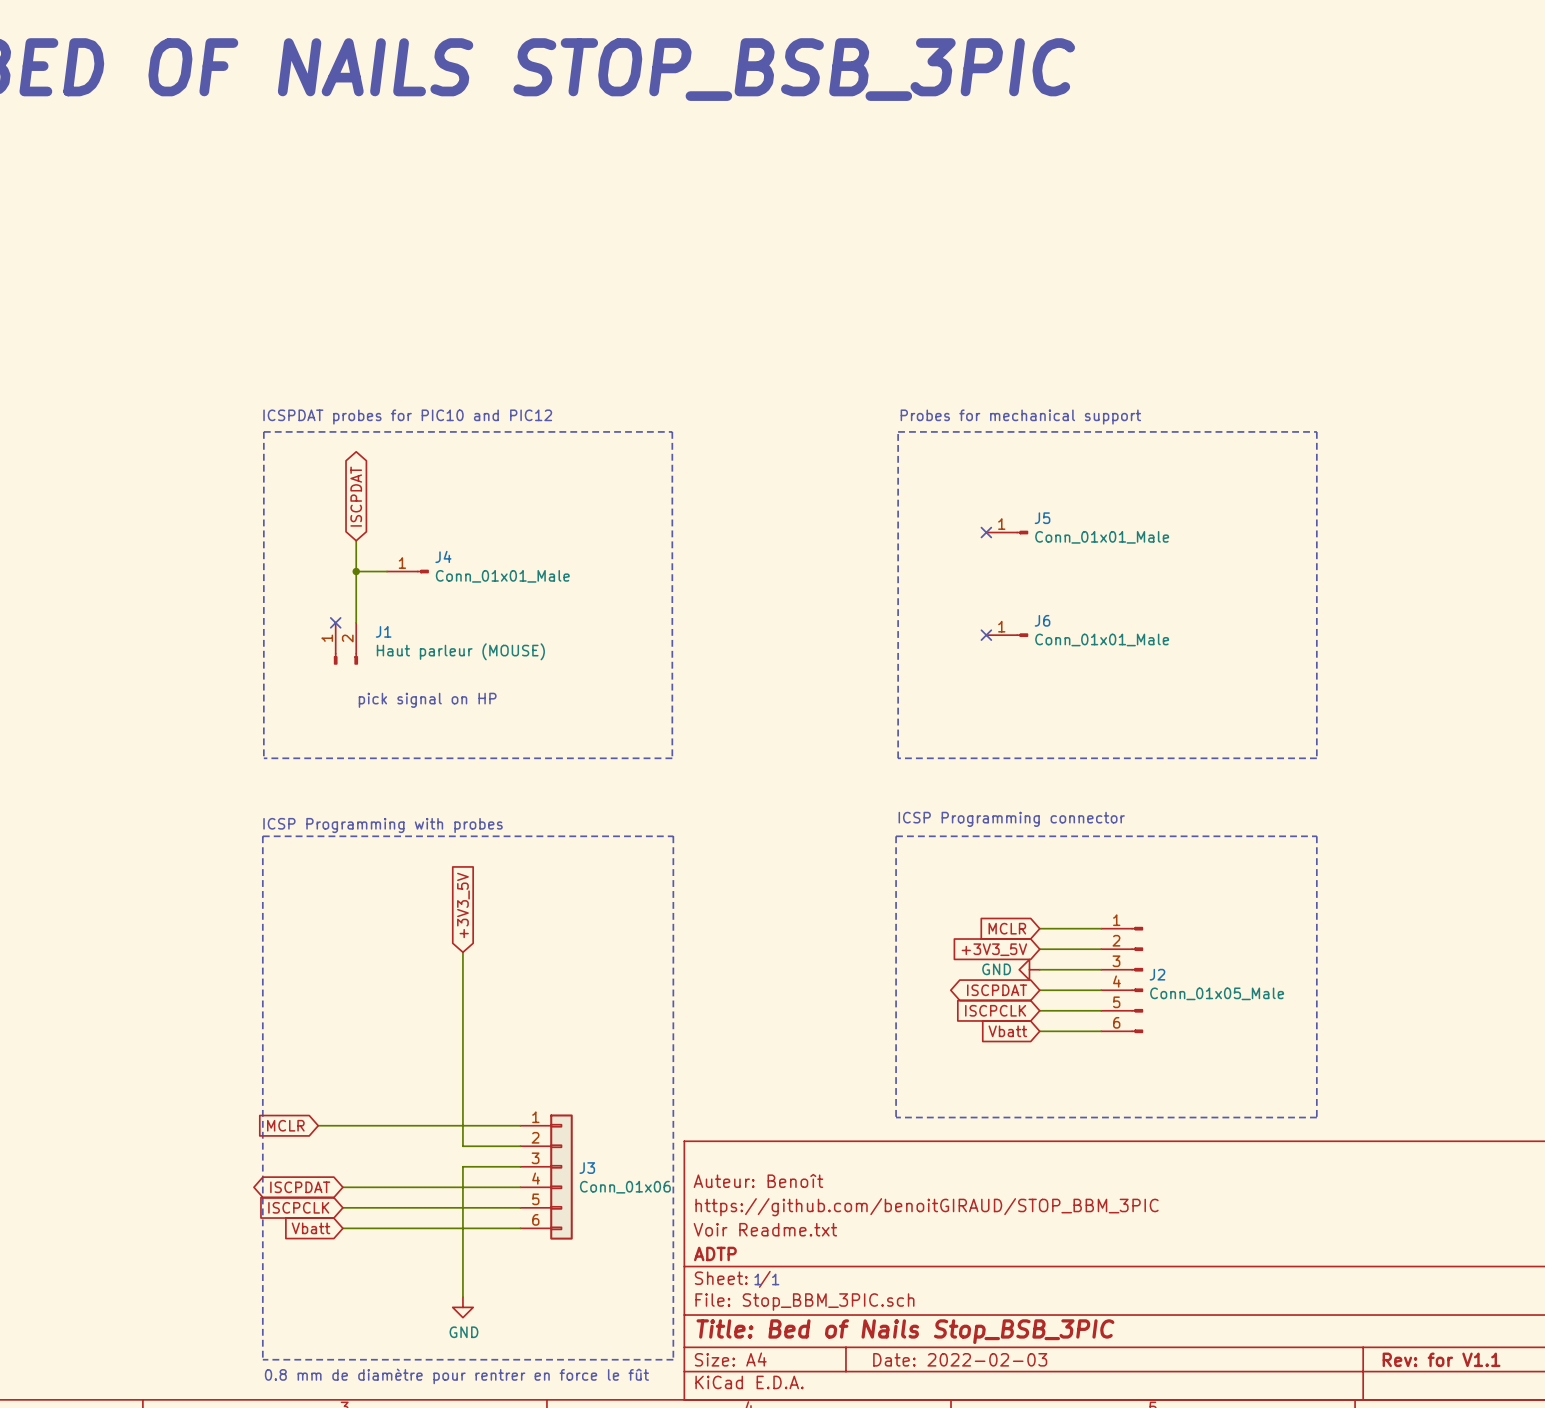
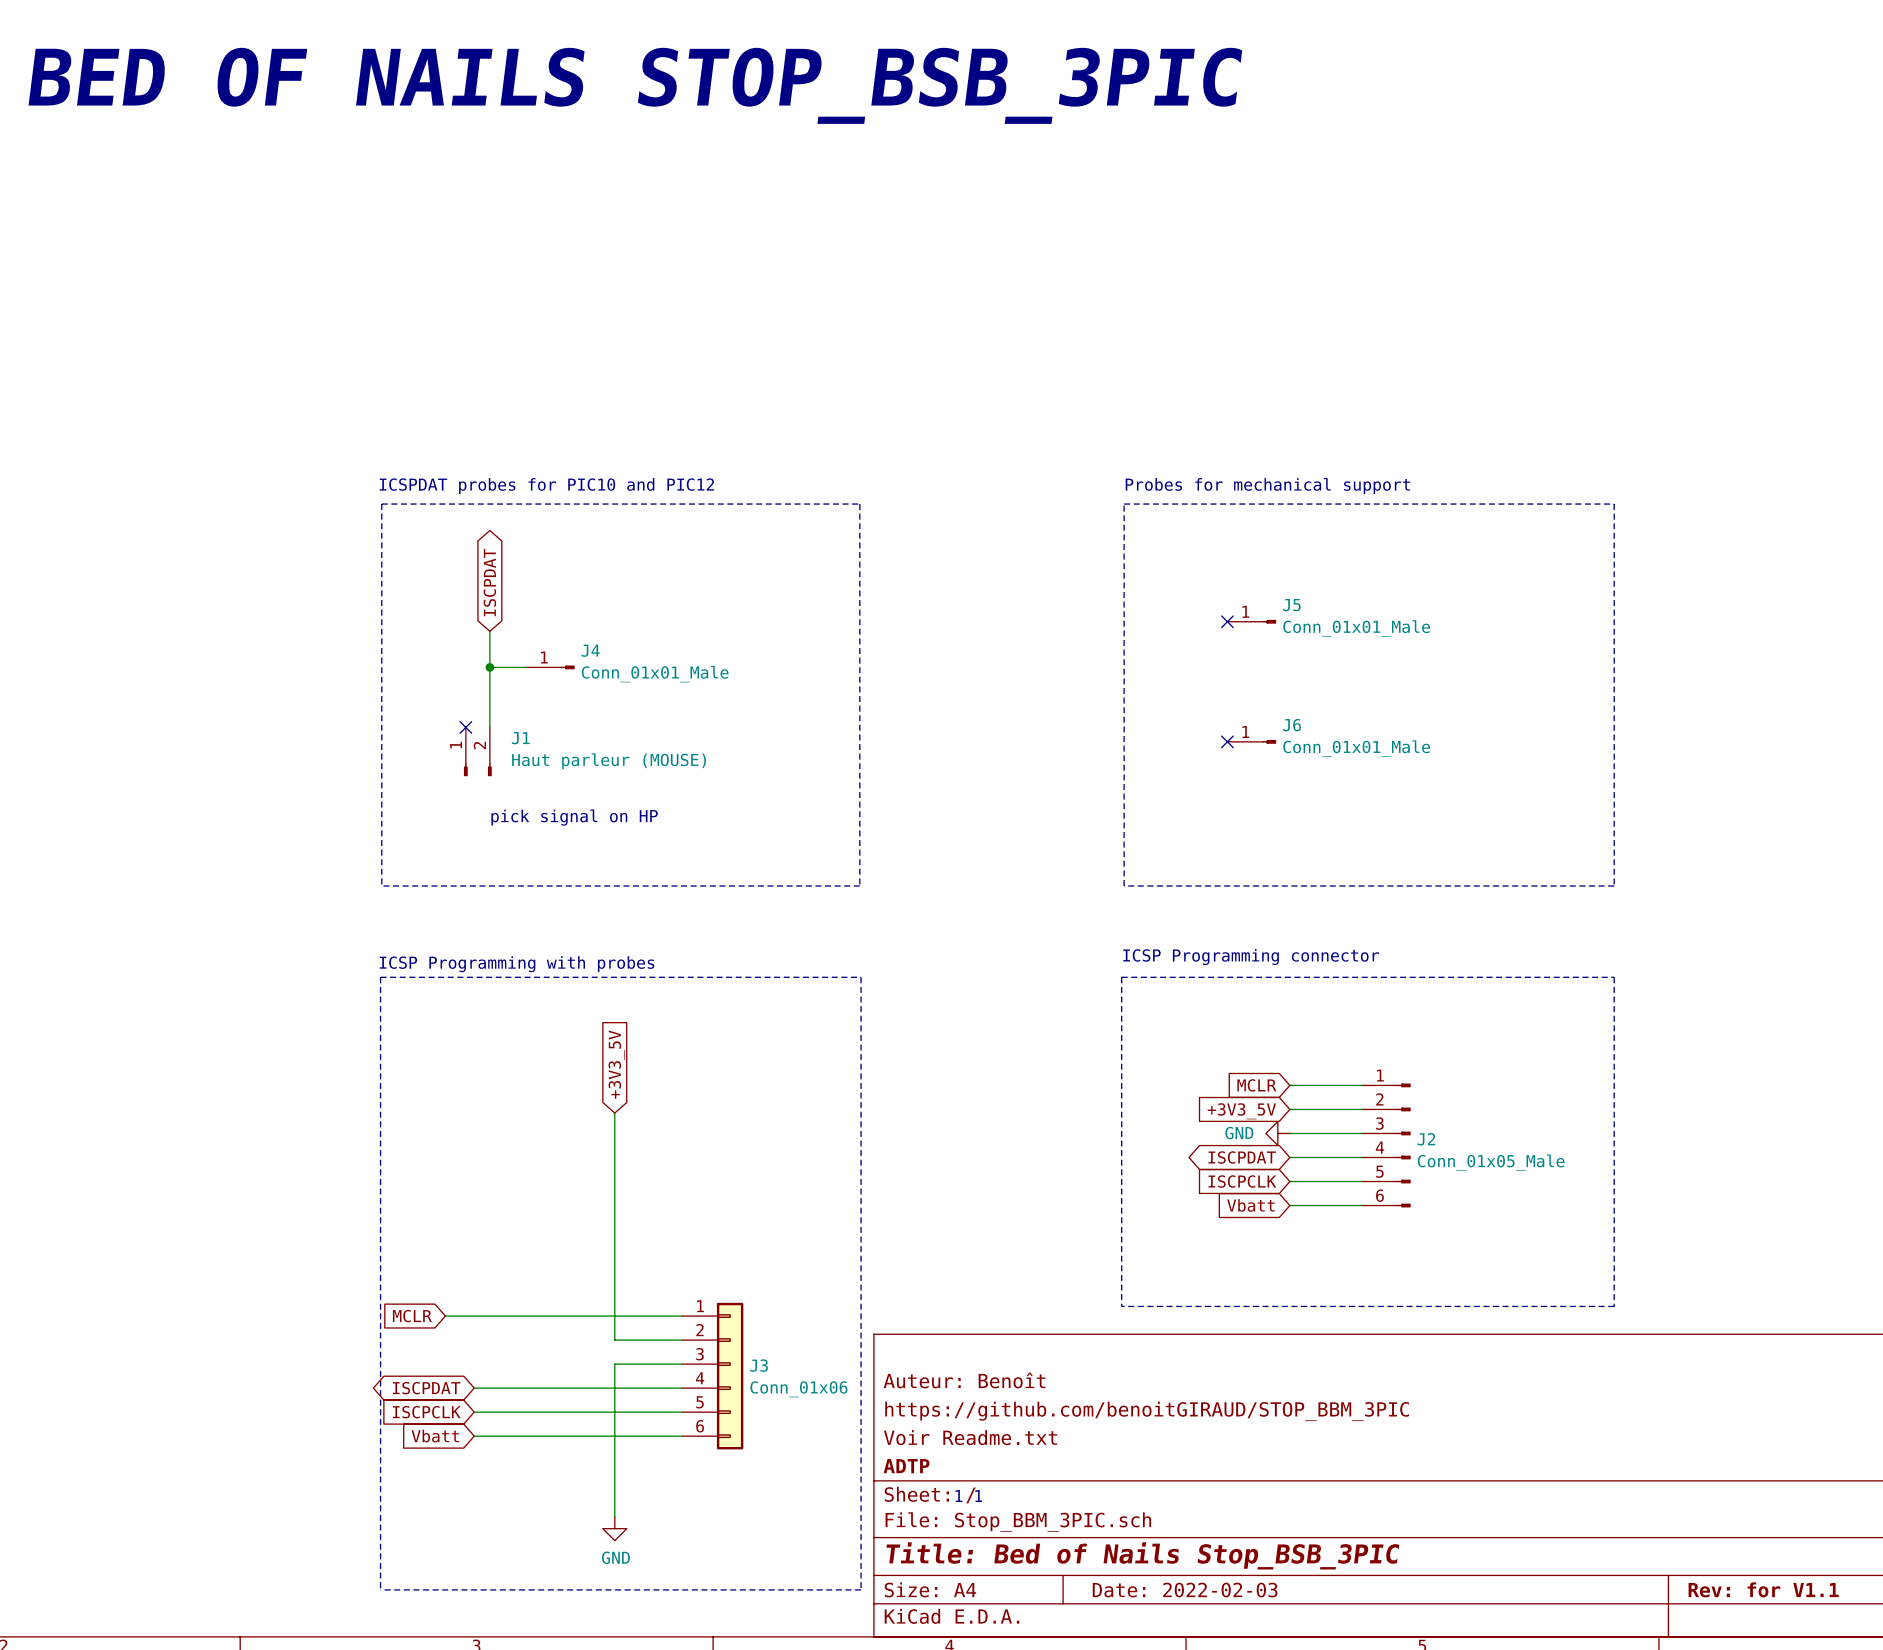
text: 0.8 mm de diamètre pour rentrer en force le fût (456, 1376) -> none

